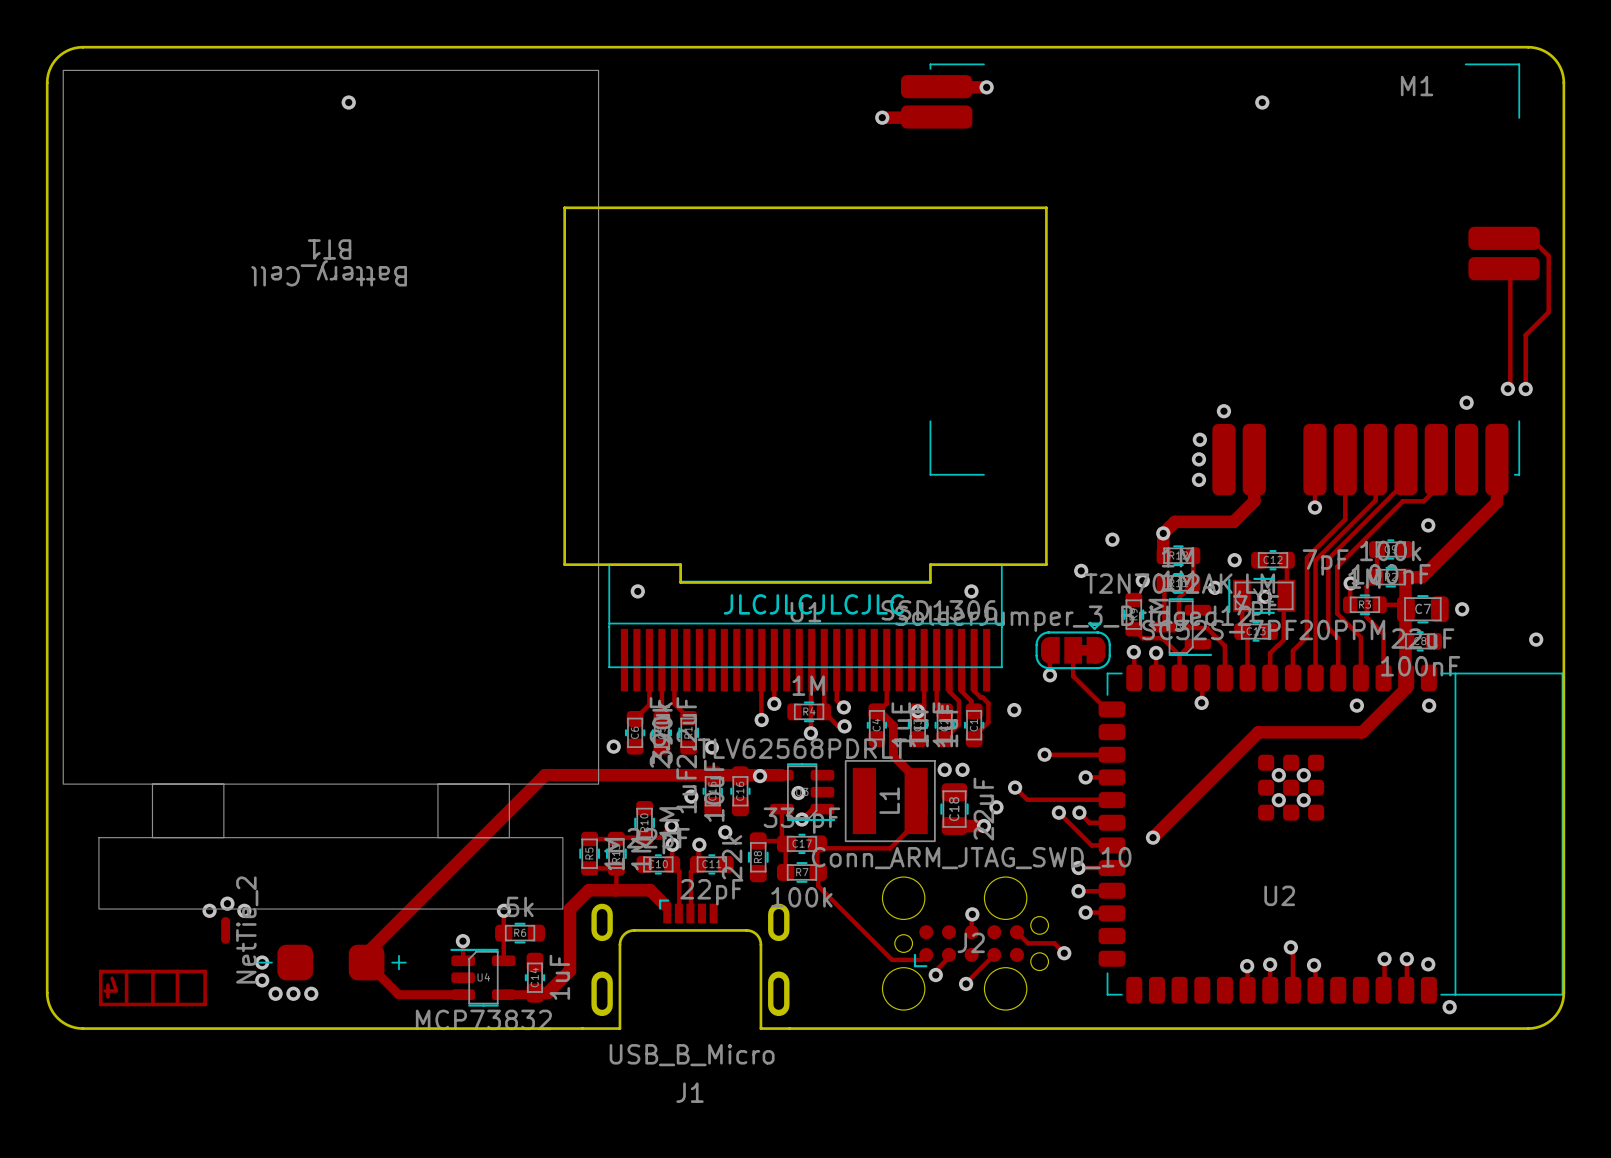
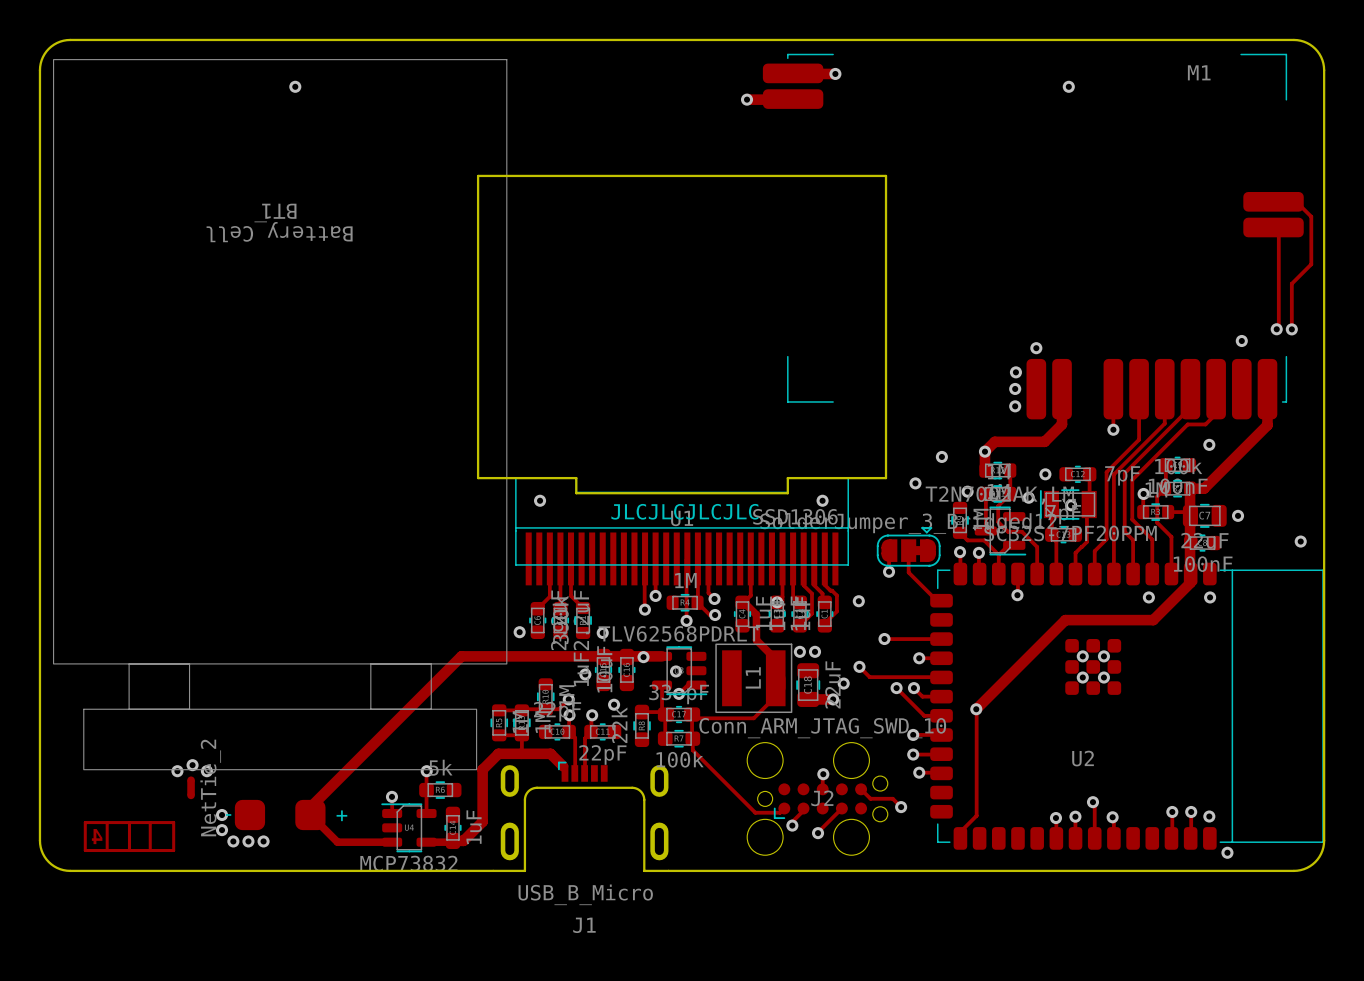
track: none -> (976, 709) (976, 815) (960, 832)

